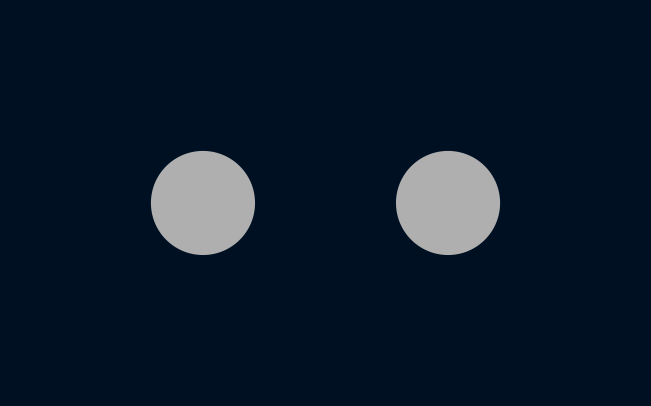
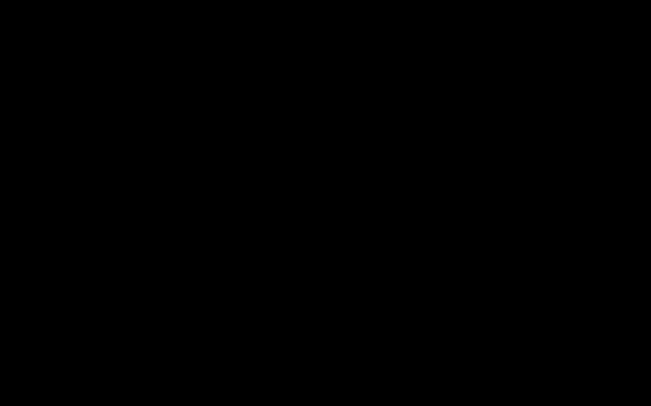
drawing: [150, 150, 256, 256] -> none
drawing: [395, 150, 501, 256] -> none

